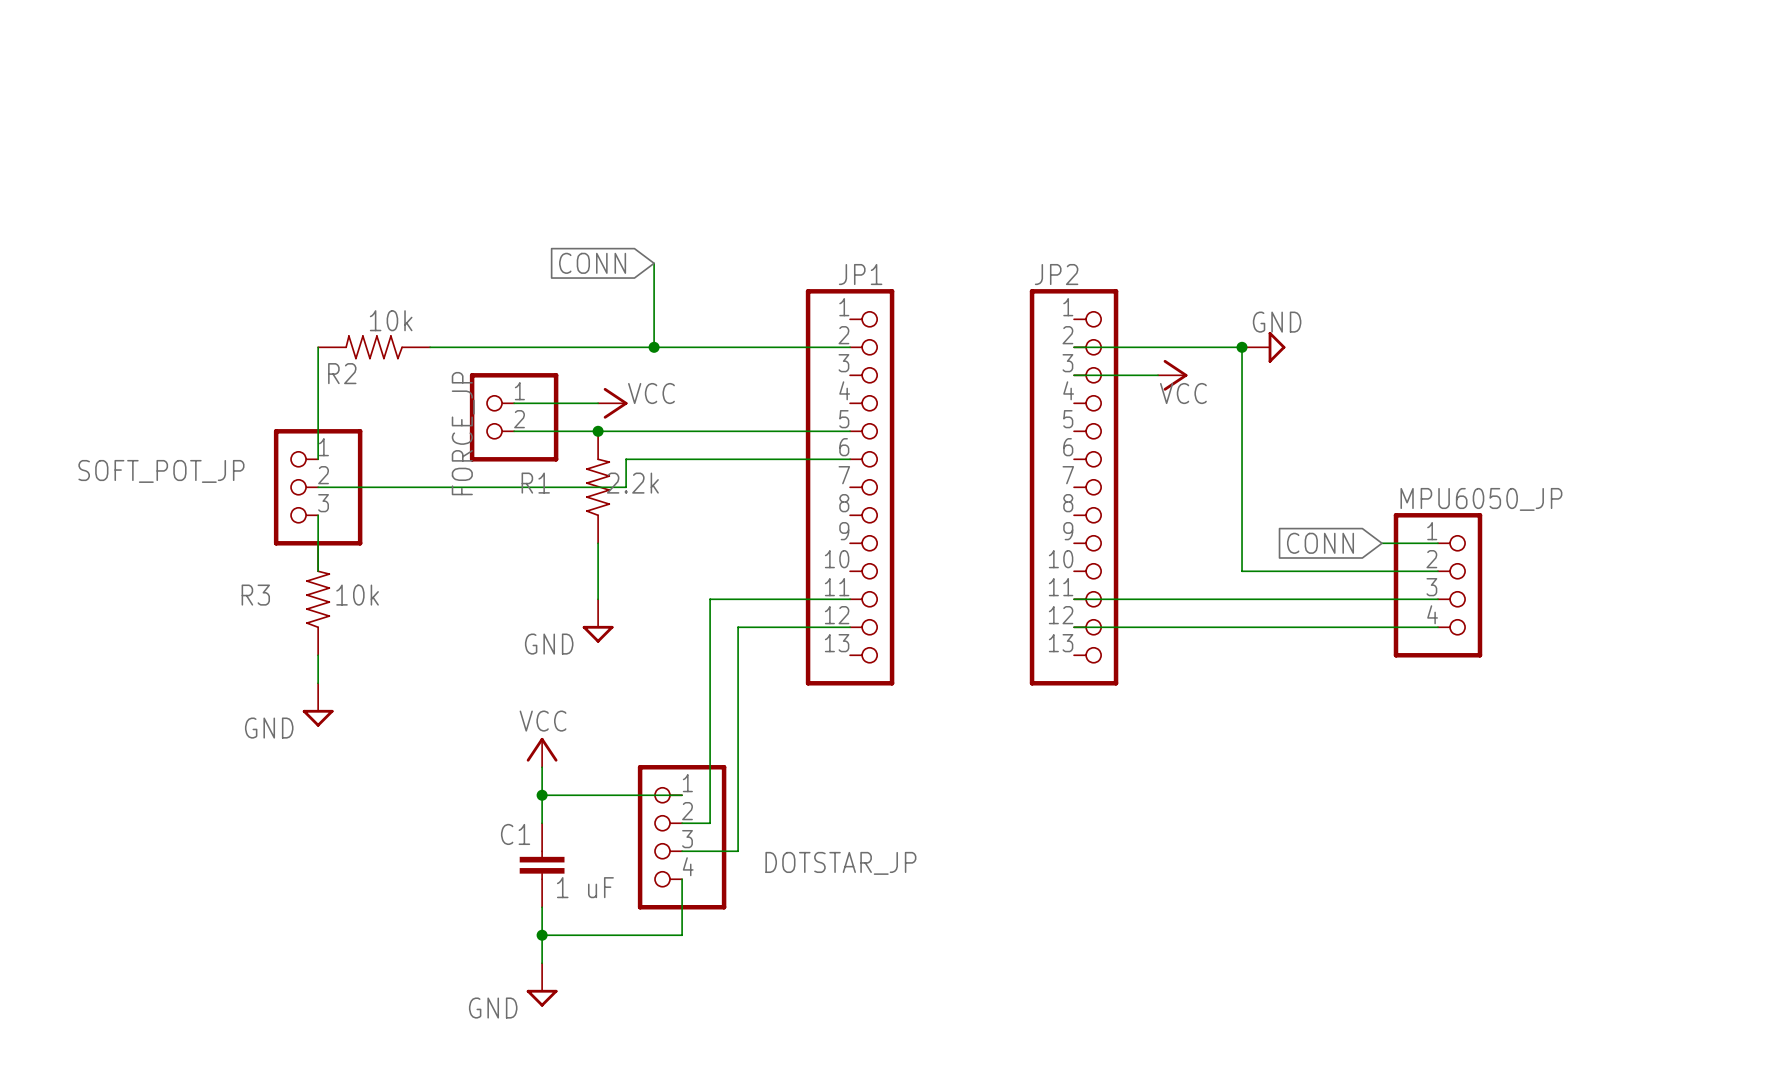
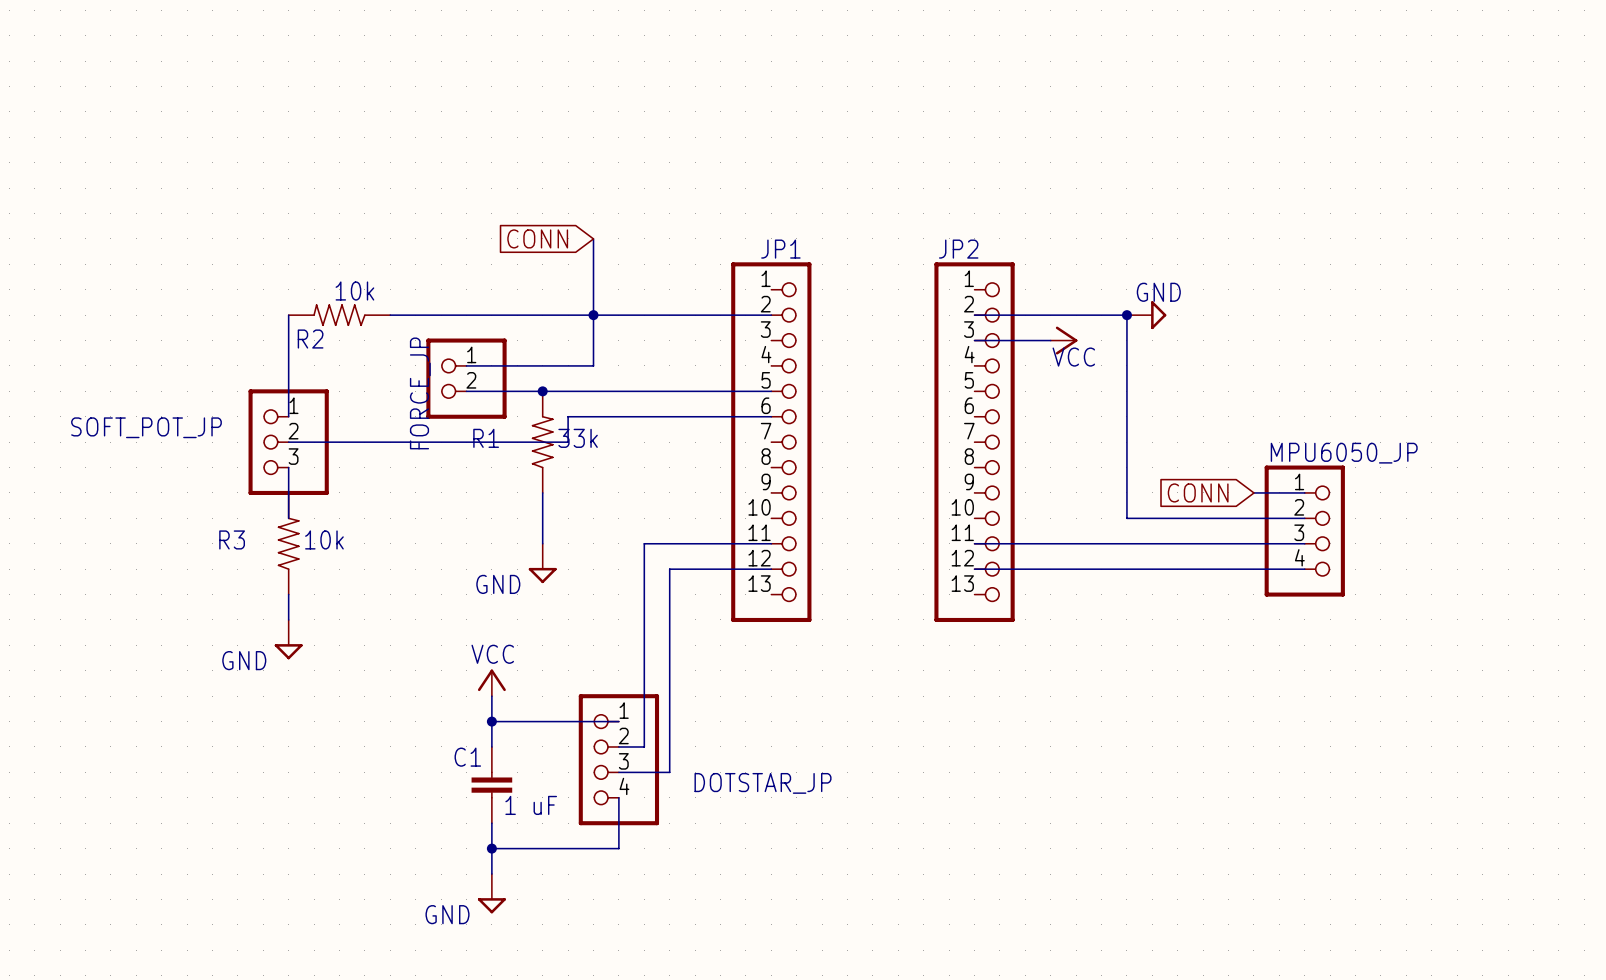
wire: none -> (593, 315) (593, 365) (542, 365)
power symbol: VCC (612, 403) -> none
R1 value: 2.2k (632, 483) -> 33k (578, 438)

